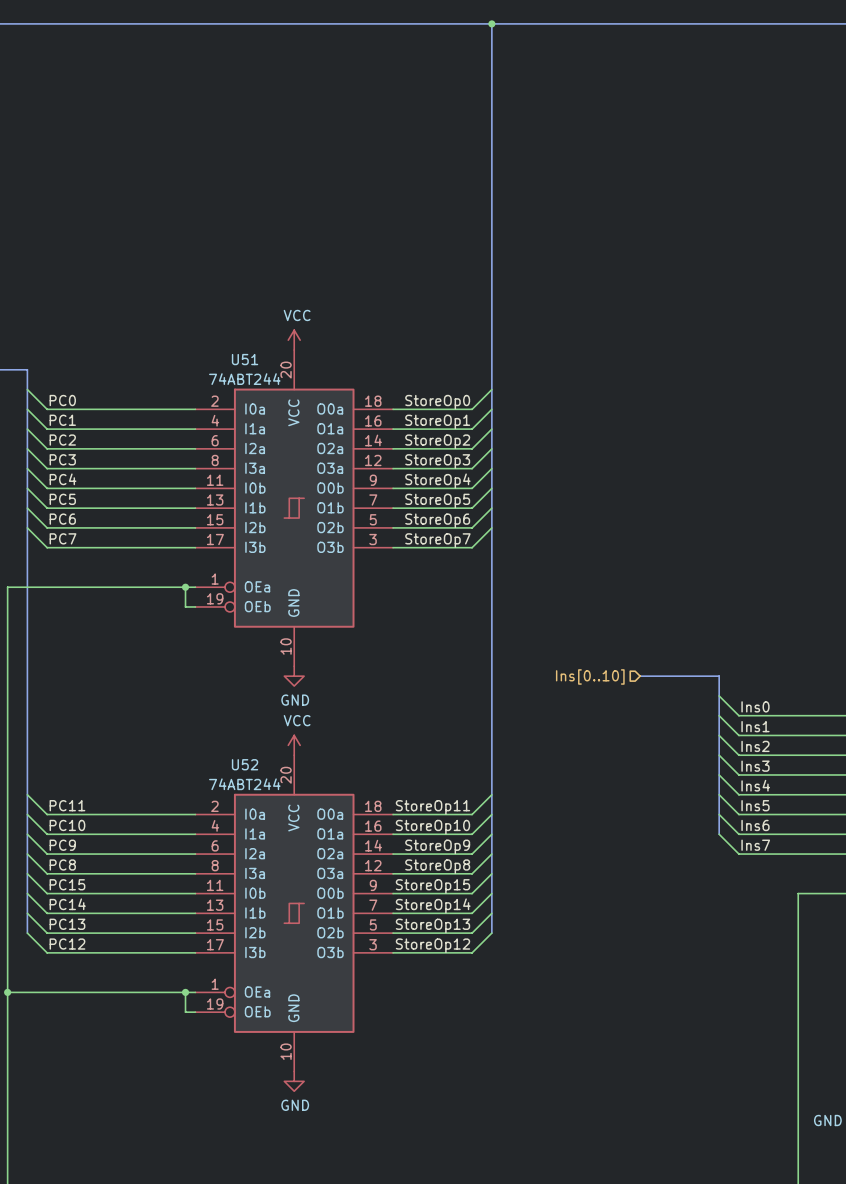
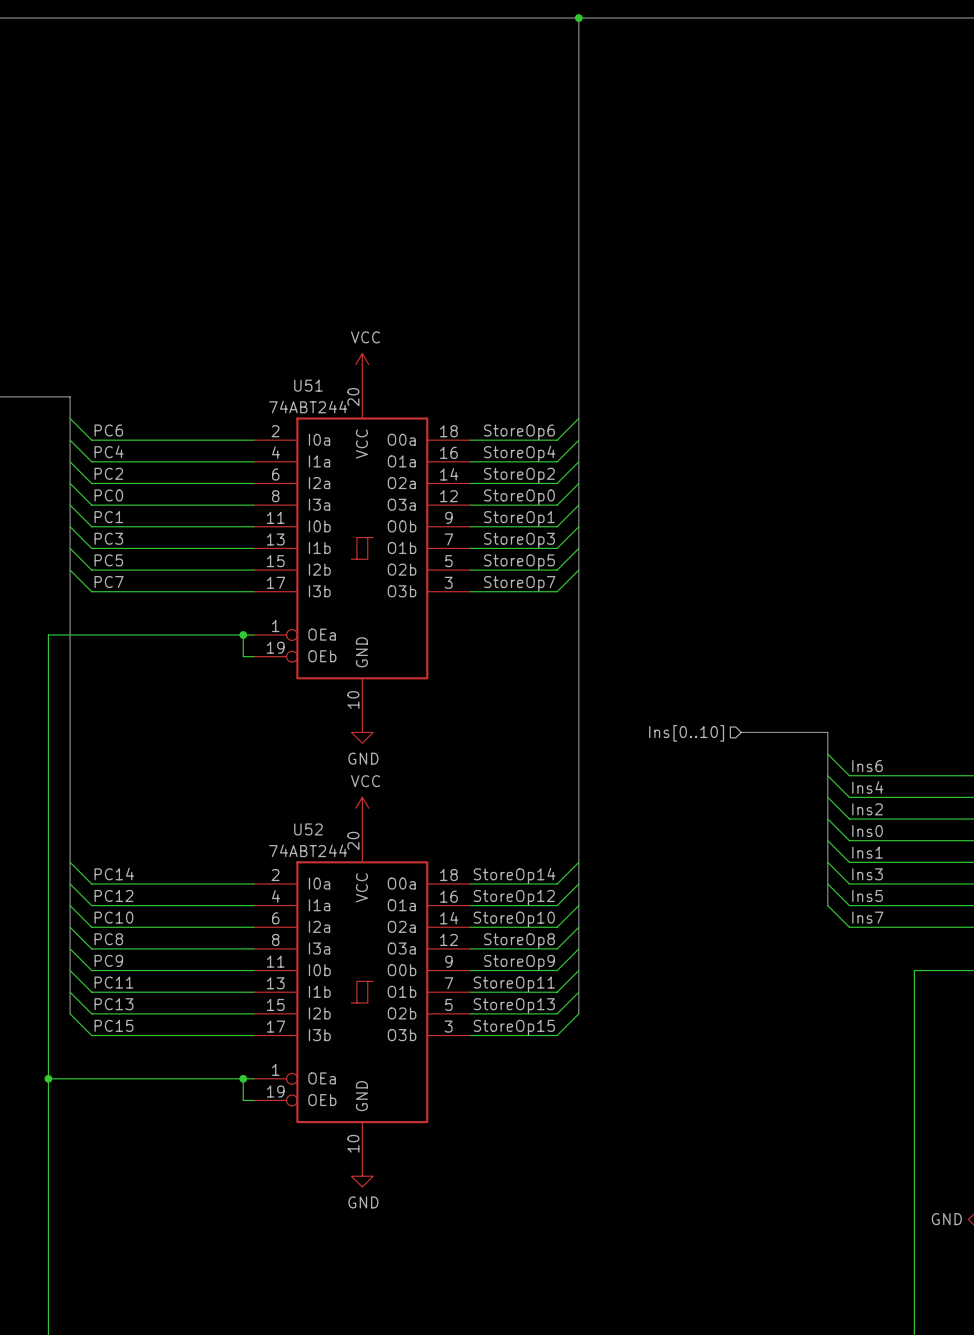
label: PC0 (62, 400) -> PC6 (108, 430)
label: StoreOp0 (437, 402) -> StoreOp6 (519, 432)
label: PC1 (62, 420) -> PC4 (109, 451)
label: StoreOp1 (437, 421) -> StoreOp4 (519, 453)
label: PC3 (62, 459) -> PC0 (108, 495)
label: StoreOp3 (437, 461) -> StoreOp0 (519, 497)
label: PC4 (62, 479) -> PC1 (108, 517)
label: StoreOp4 (437, 480) -> StoreOp1 (519, 518)
label: PC5 (62, 499) -> PC3 (108, 538)
label: StoreOp5 (437, 500) -> StoreOp3 (519, 540)
label: PC6 (62, 519) -> PC5 (108, 560)
label: StoreOp6 (437, 520) -> StoreOp5 (519, 562)
label: Ins0 (755, 706) -> Ins6 (867, 766)
label: Ins1 (755, 726) -> Ins4 (867, 787)
label: Ins3 (755, 766) -> Ins0 (867, 831)
label: Ins4 (755, 785) -> Ins1 (867, 852)
label: PC11 (67, 805) -> PC14 (114, 874)
label: Ins5 (755, 805) -> Ins3 (867, 874)
label: StoreOp11 (432, 807) -> StoreOp14 (514, 875)
label: PC10 (67, 825) -> PC12 (113, 895)
label: Ins6 (755, 825) -> Ins5 (867, 895)
label: StoreOp10 (432, 827) -> StoreOp12 (514, 897)
label: PC9 (62, 845) -> PC10 (113, 917)
label: StoreOp9 (437, 846) -> StoreOp10 (514, 919)
label: PC15 (67, 884) -> PC9 (108, 960)
label: StoreOp15 (432, 886) -> StoreOp9 (519, 962)
label: PC14 (67, 904) -> PC11 (113, 982)
label: StoreOp14 (433, 905) -> StoreOp11 (514, 984)
label: PC12 (67, 944) -> PC15 (113, 1025)
label: StoreOp12 (432, 945) -> StoreOp15 (514, 1027)

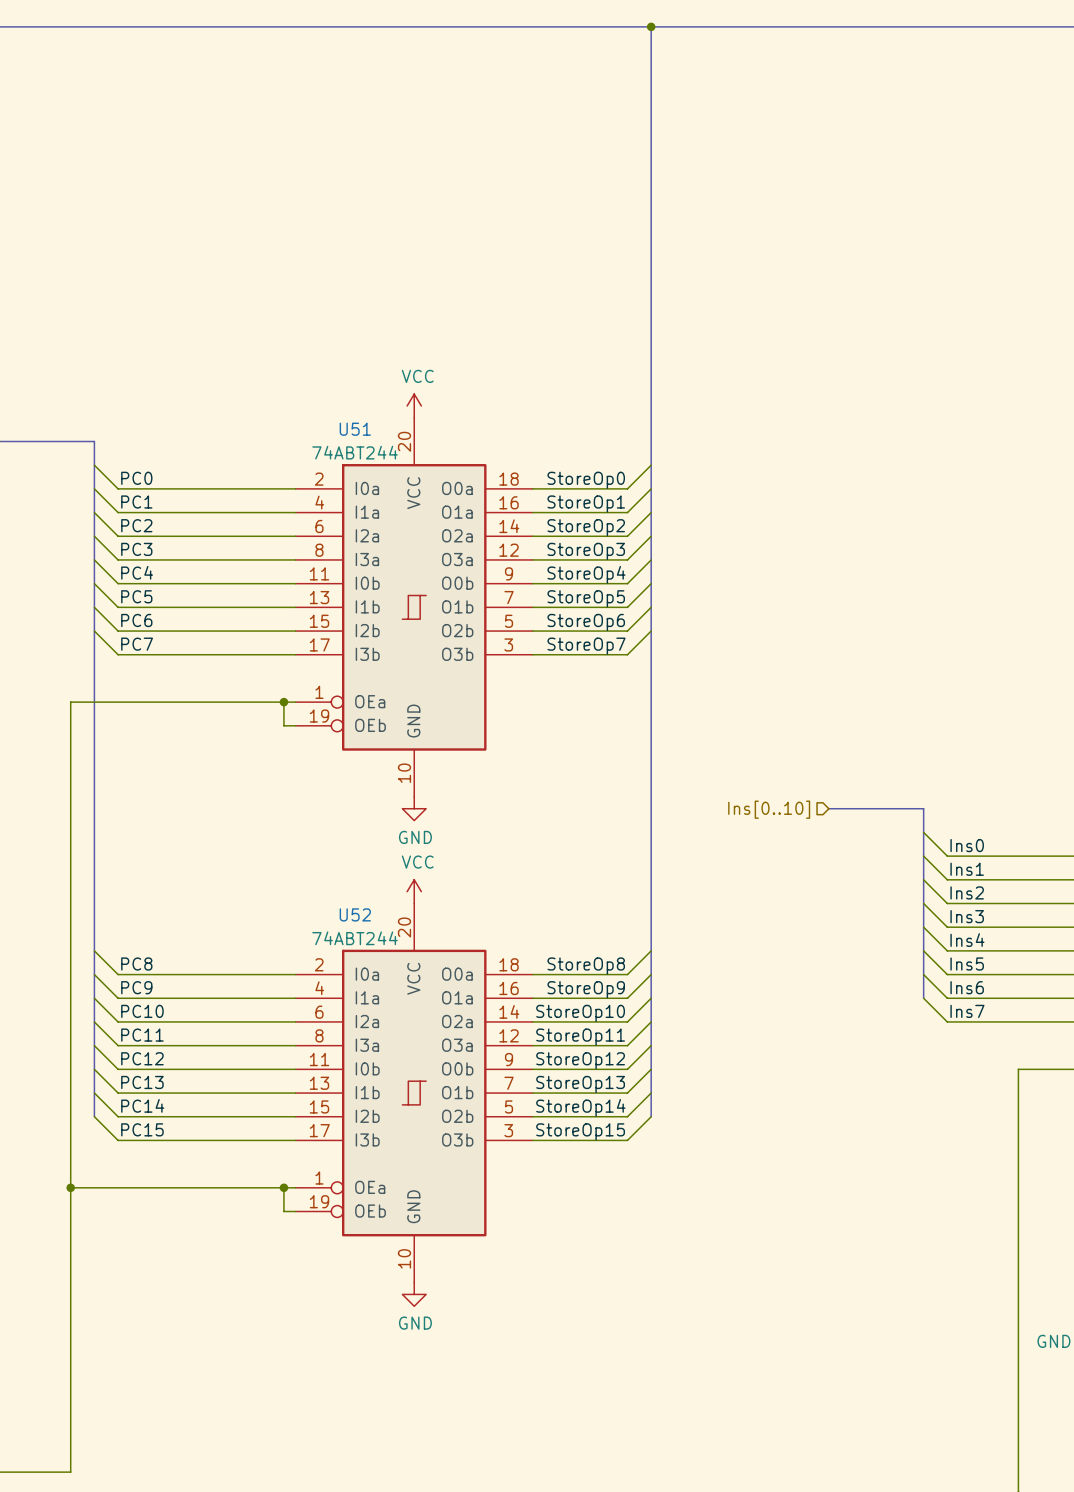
label: PC6 (108, 430) -> PC0 (136, 478)
label: StoreOp6 (519, 432) -> StoreOp0 (586, 480)
label: PC4 (109, 451) -> PC1 (136, 502)
label: StoreOp4 (519, 453) -> StoreOp1 (586, 503)
label: PC0 (108, 495) -> PC3 (136, 549)
label: StoreOp0 (519, 497) -> StoreOp3 (586, 551)
label: PC1 (108, 517) -> PC4 (137, 572)
label: StoreOp1 (519, 518) -> StoreOp4 (586, 574)
label: PC3 (108, 538) -> PC5 (136, 596)
label: StoreOp3 (519, 540) -> StoreOp5 (586, 598)
label: PC5 (108, 560) -> PC6 (136, 620)
label: StoreOp5 (519, 562) -> StoreOp6 (586, 622)
label: Ins6 (867, 766) -> Ins0 (967, 845)
label: Ins4 (867, 787) -> Ins1 (967, 869)
label: Ins0 (867, 831) -> Ins3 (967, 916)
label: Ins1 (867, 852) -> Ins4 (967, 940)
label: PC14 (114, 874) -> PC8 (136, 964)
label: Ins3 (867, 874) -> Ins5 (967, 964)
label: StoreOp14 (514, 875) -> StoreOp8 (586, 965)
label: PC12 (113, 895) -> PC9 (136, 987)
label: Ins5 (867, 895) -> Ins6 (967, 987)
label: StoreOp12 (514, 897) -> StoreOp9 (586, 989)
label: PC8 (108, 939) -> PC11 (142, 1035)
label: StoreOp8 (519, 941) -> StoreOp11 (580, 1037)
label: PC9 (108, 960) -> PC12 (142, 1058)
label: StoreOp9 (519, 962) -> StoreOp12 (580, 1060)
label: PC11 (113, 982) -> PC13 (142, 1082)
label: StoreOp11 (514, 984) -> StoreOp13 (580, 1084)
label: PC13 (113, 1004) -> PC14 (142, 1105)
label: StoreOp13 (514, 1006) -> StoreOp14 (580, 1107)

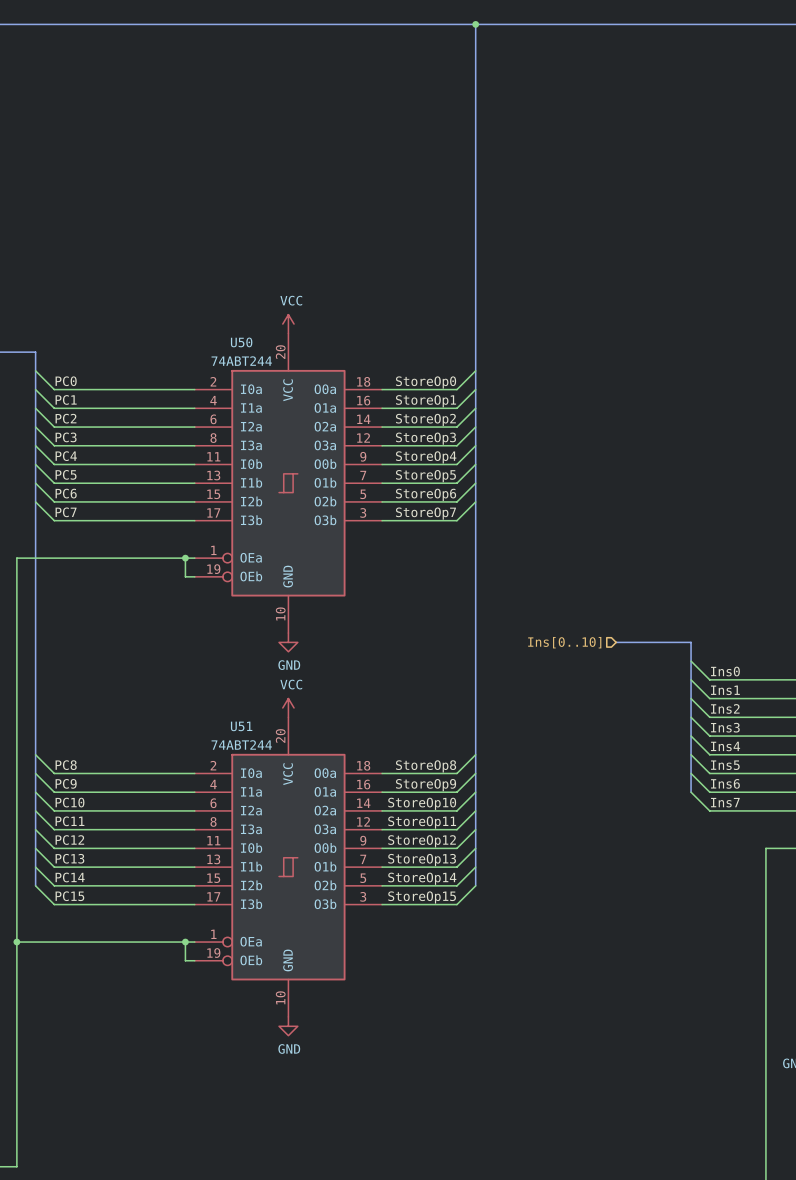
U51 name: U51 (355, 429) -> U50 (241, 342)
U52 name: U52 (355, 914) -> U51 (241, 726)

